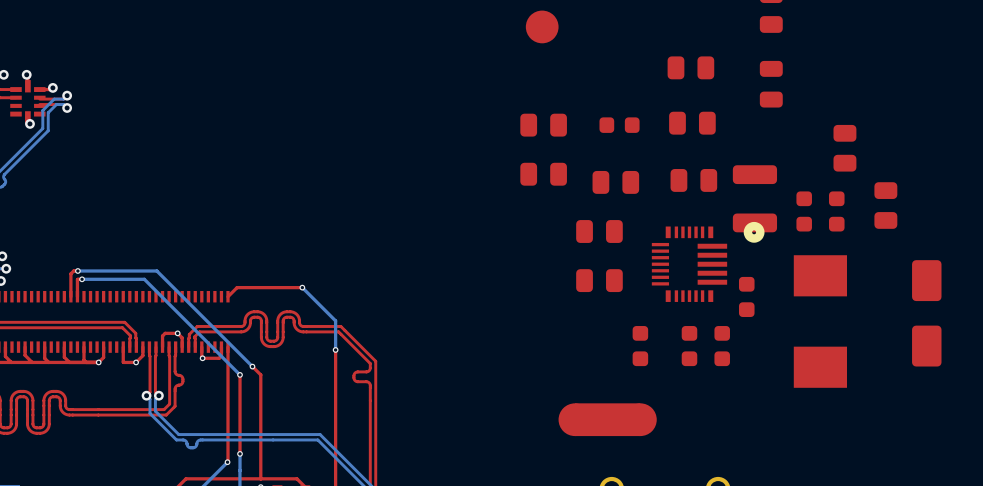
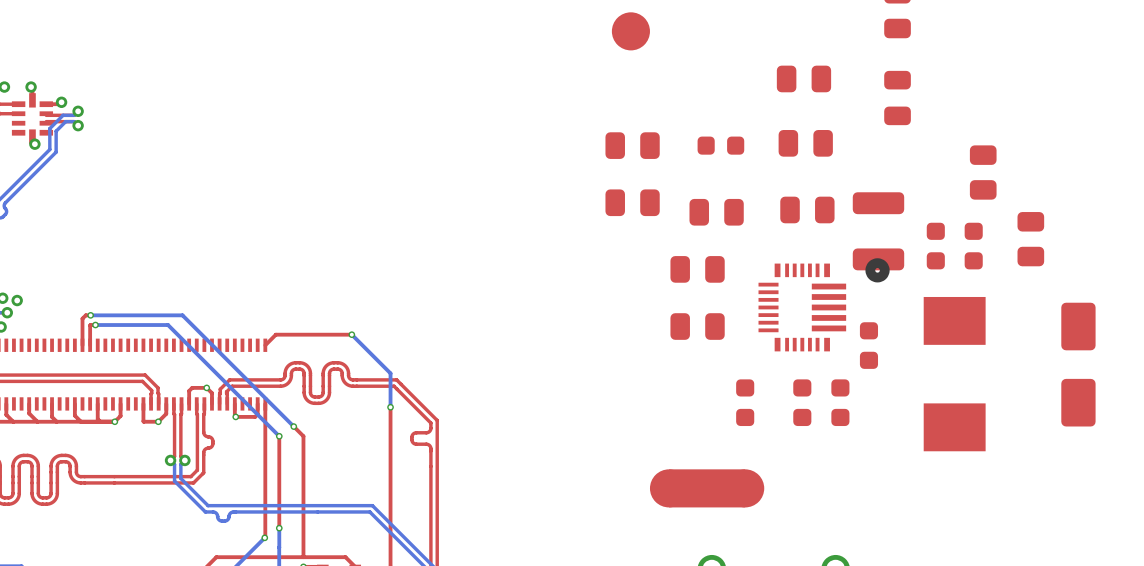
via: none -> (17, 300)

